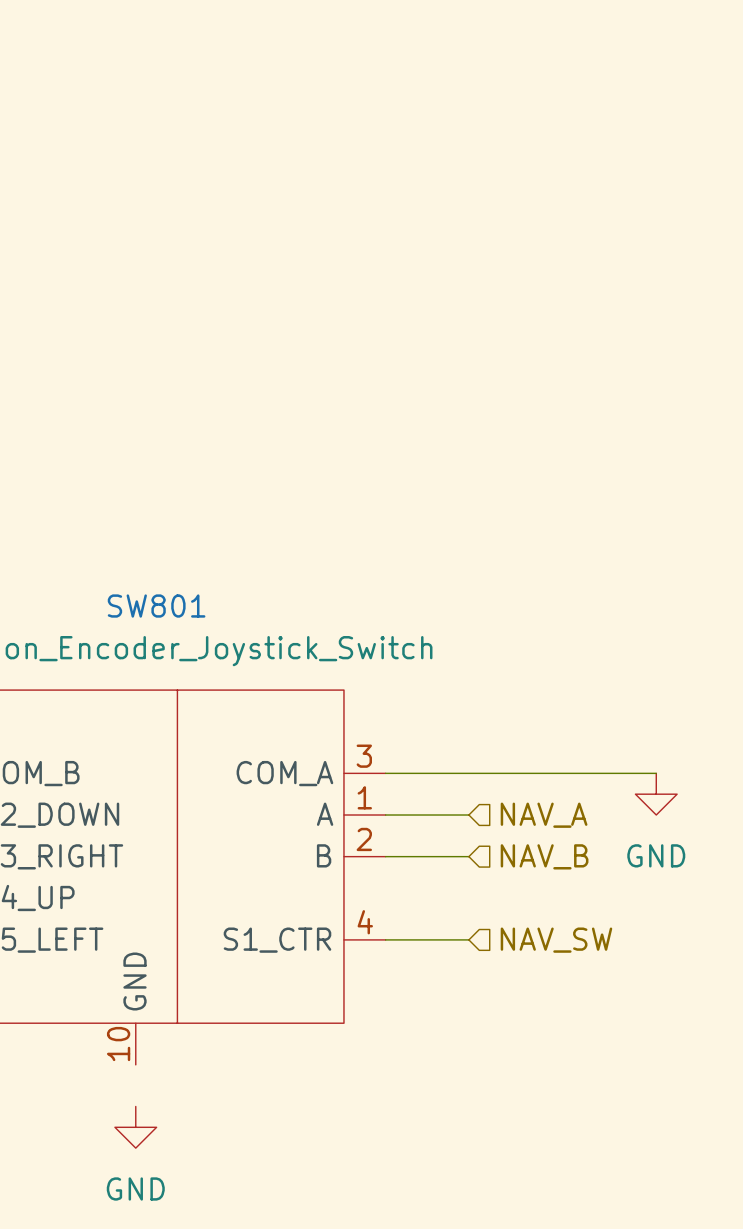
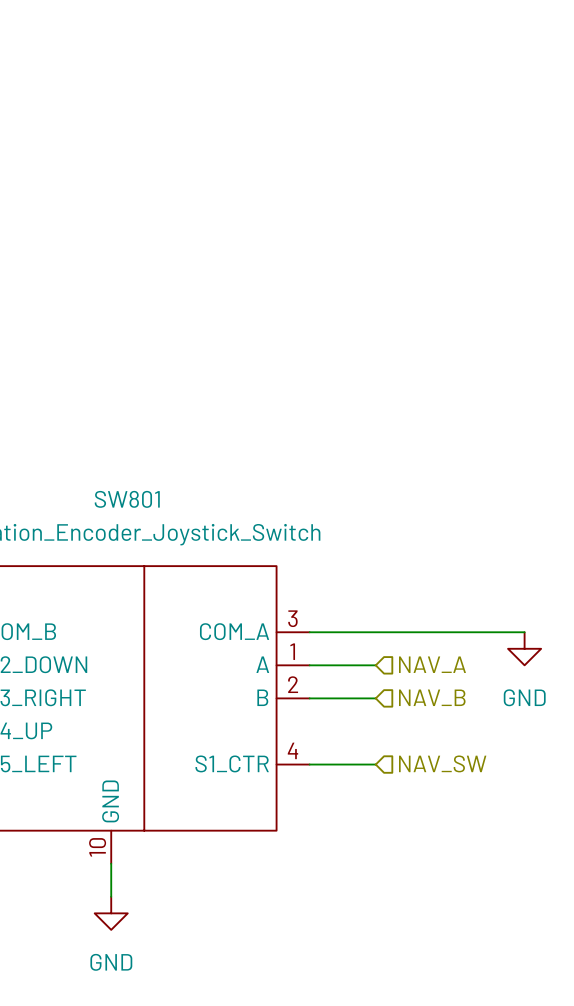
wire: none -> (111, 863) (111, 896)

